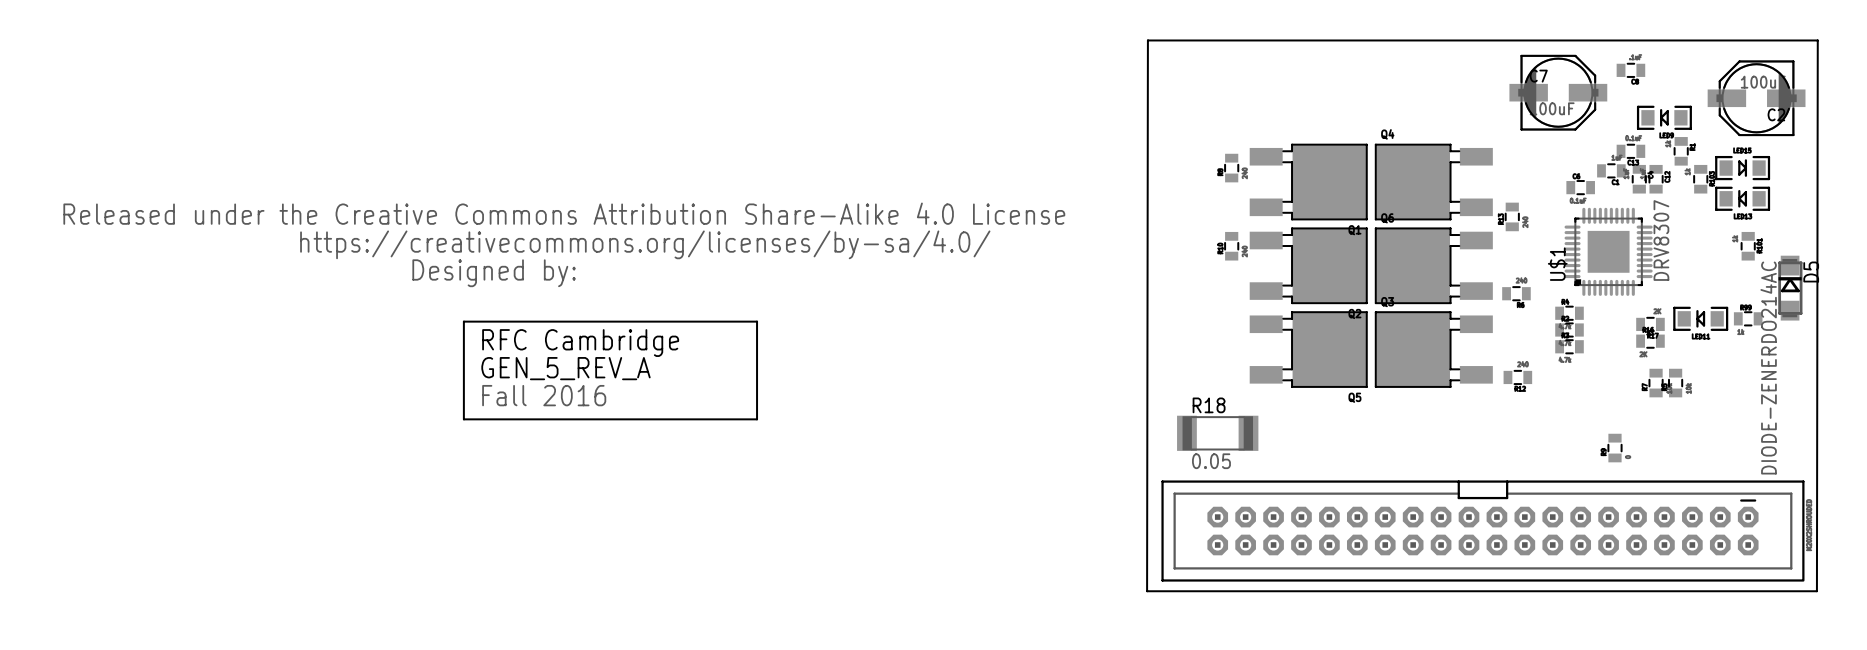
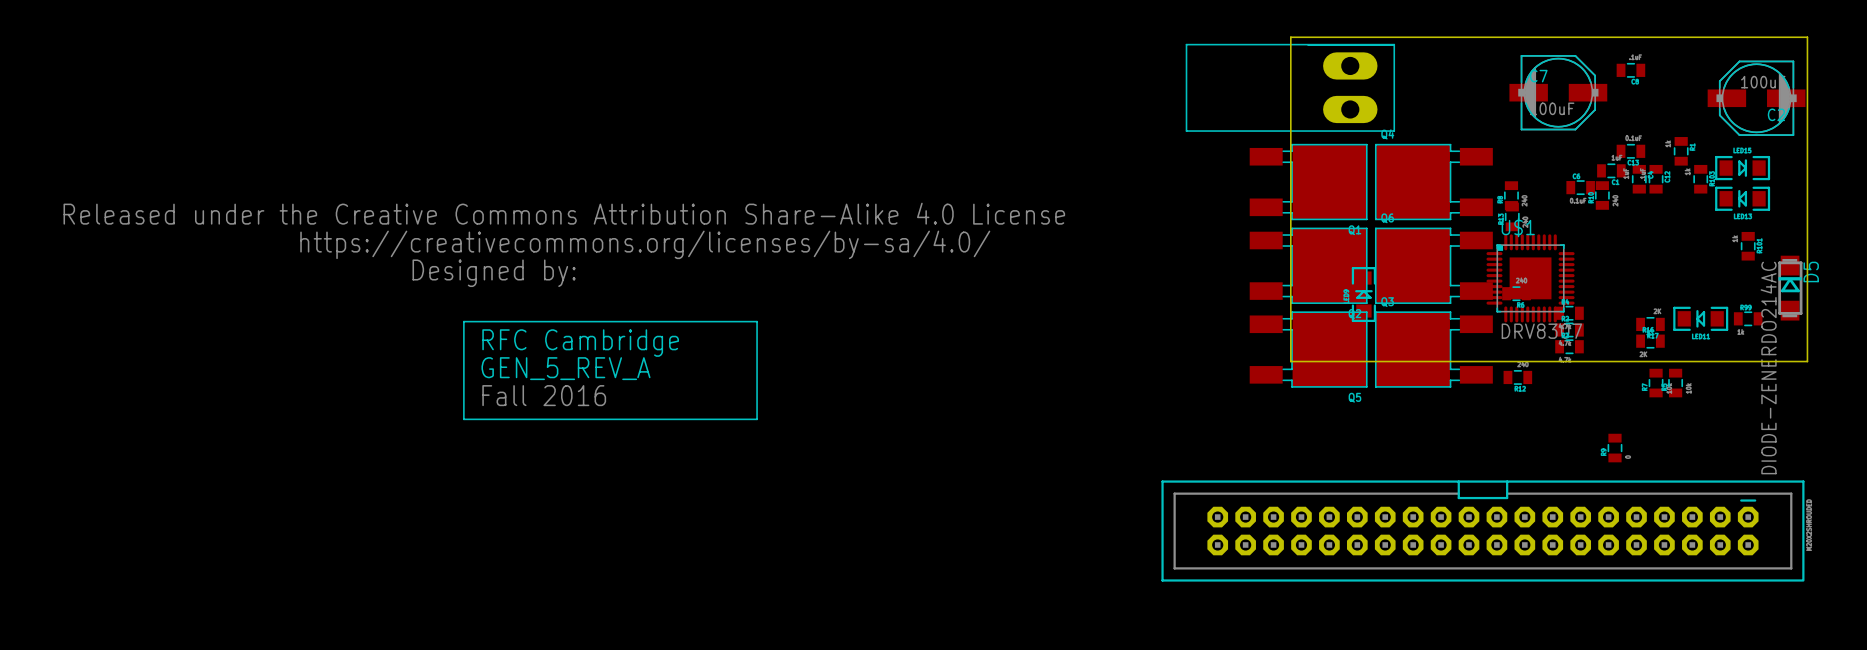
board edge: none -> (1290, 37) (1807, 37) (1807, 361) (1290, 361) (1290, 37)
board edge: (1147, 40) (1817, 40) (1816, 591) (1147, 591) (1147, 40) -> none
part: none -> (1290, 87)
part rotation: 0° (1664, 117) -> 90° clockwise (1363, 294)
part position: (1664, 117) -> (1363, 294)
part position: (1231, 168) -> (1511, 195)
part position: (1231, 246) -> (1602, 195)
U$1 rotation: 0° (1608, 251) -> 90° clockwise (1530, 278)
U$1 position: (1608, 251) -> (1530, 278)
R18: 0.05 (1217, 433) -> none

